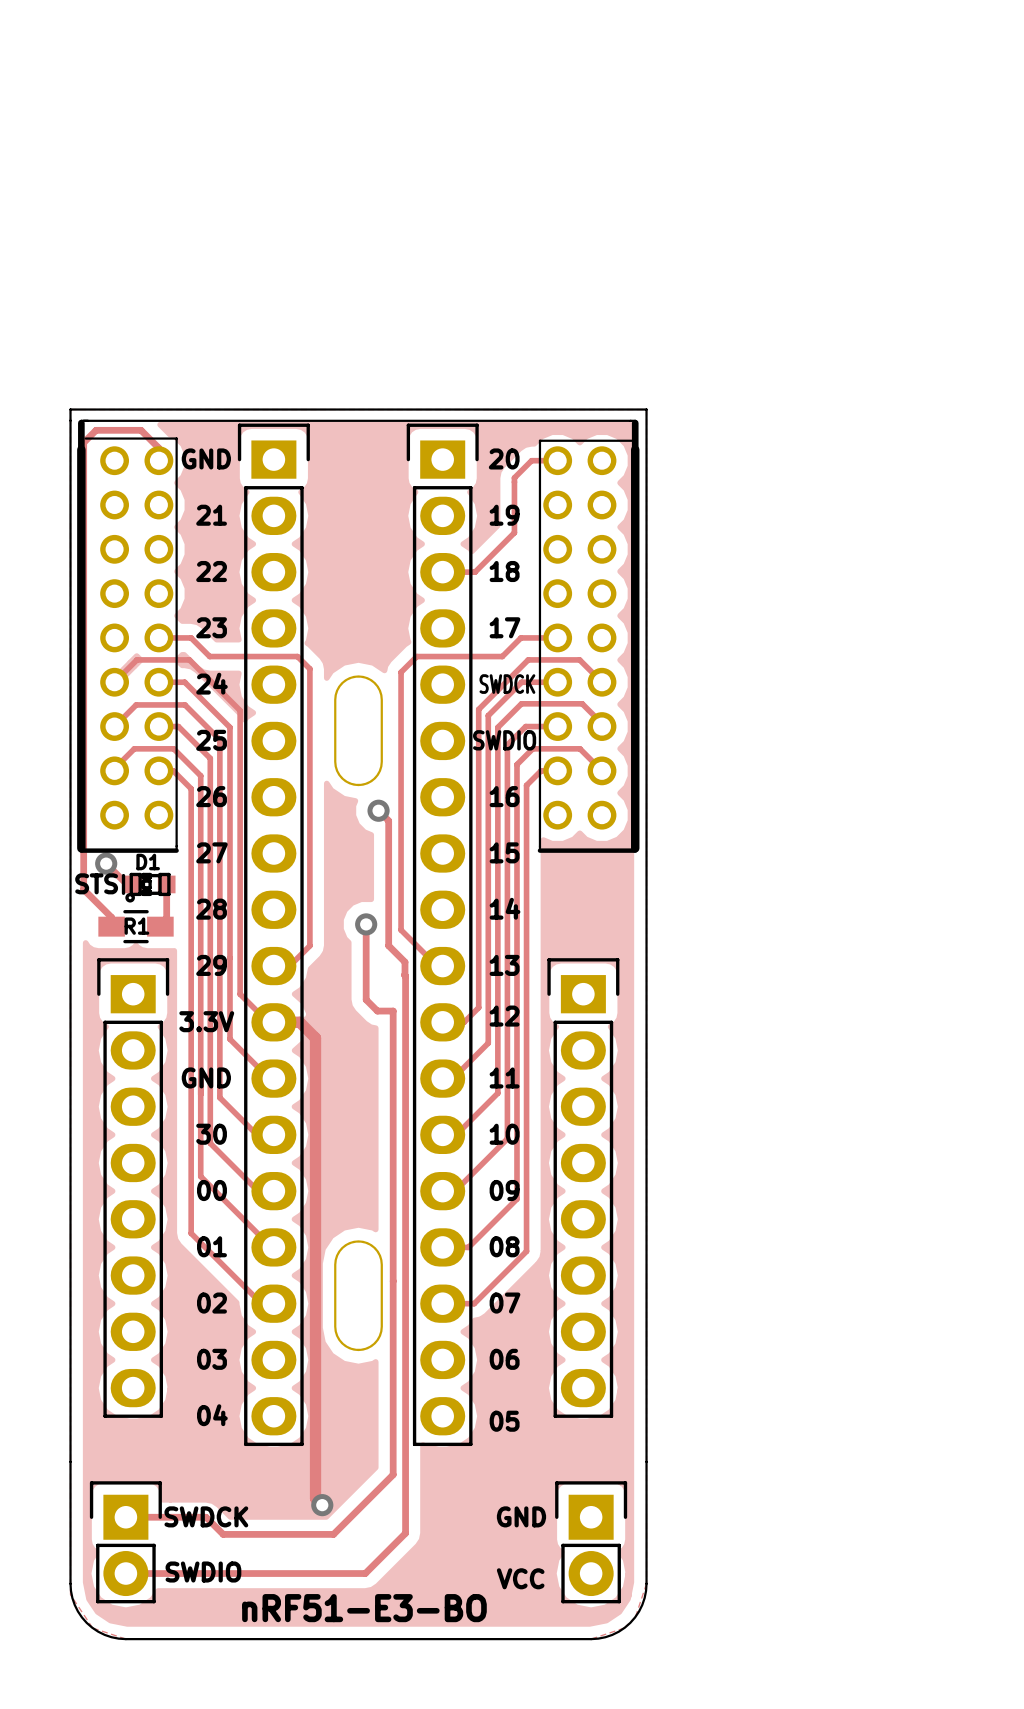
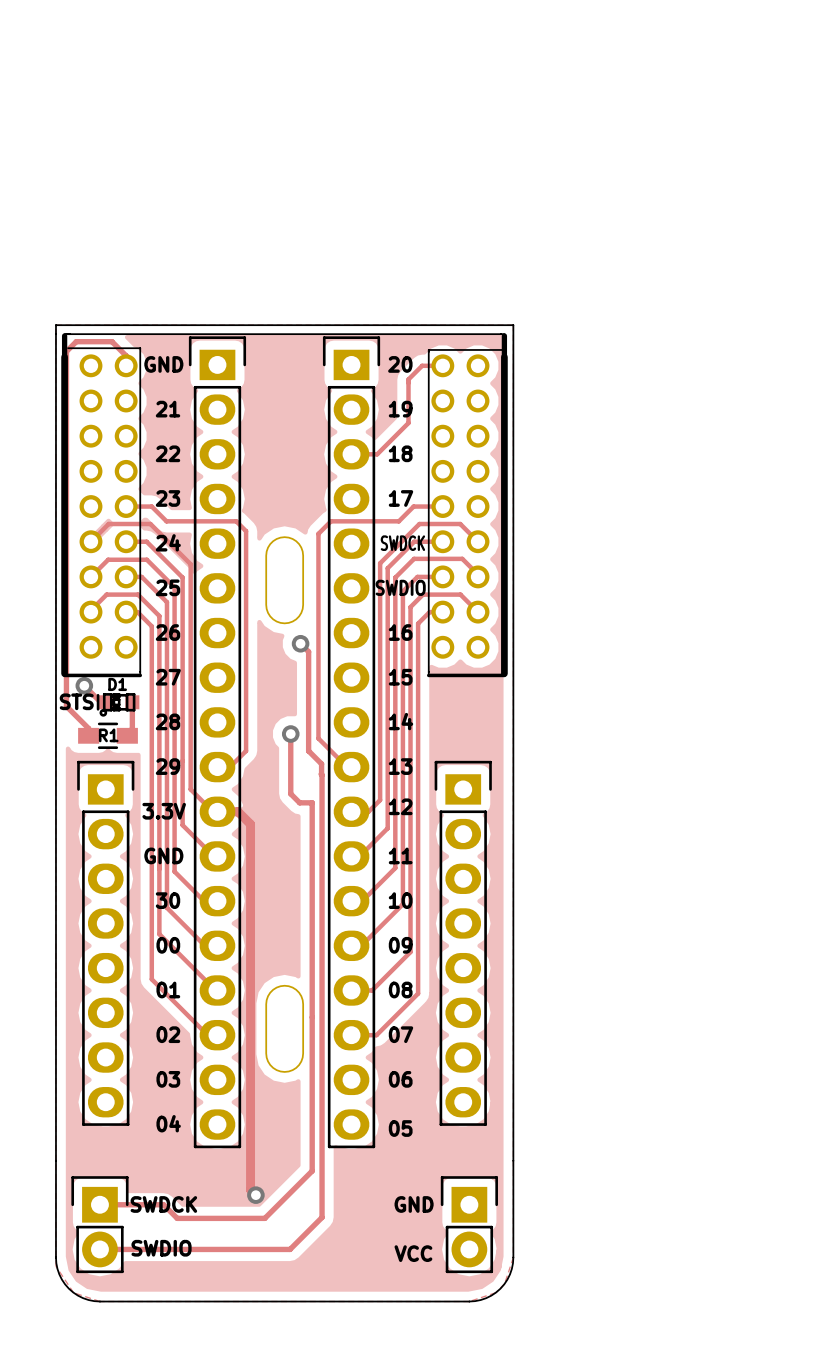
text: nRF51-E3-BO (364, 1608) -> none

